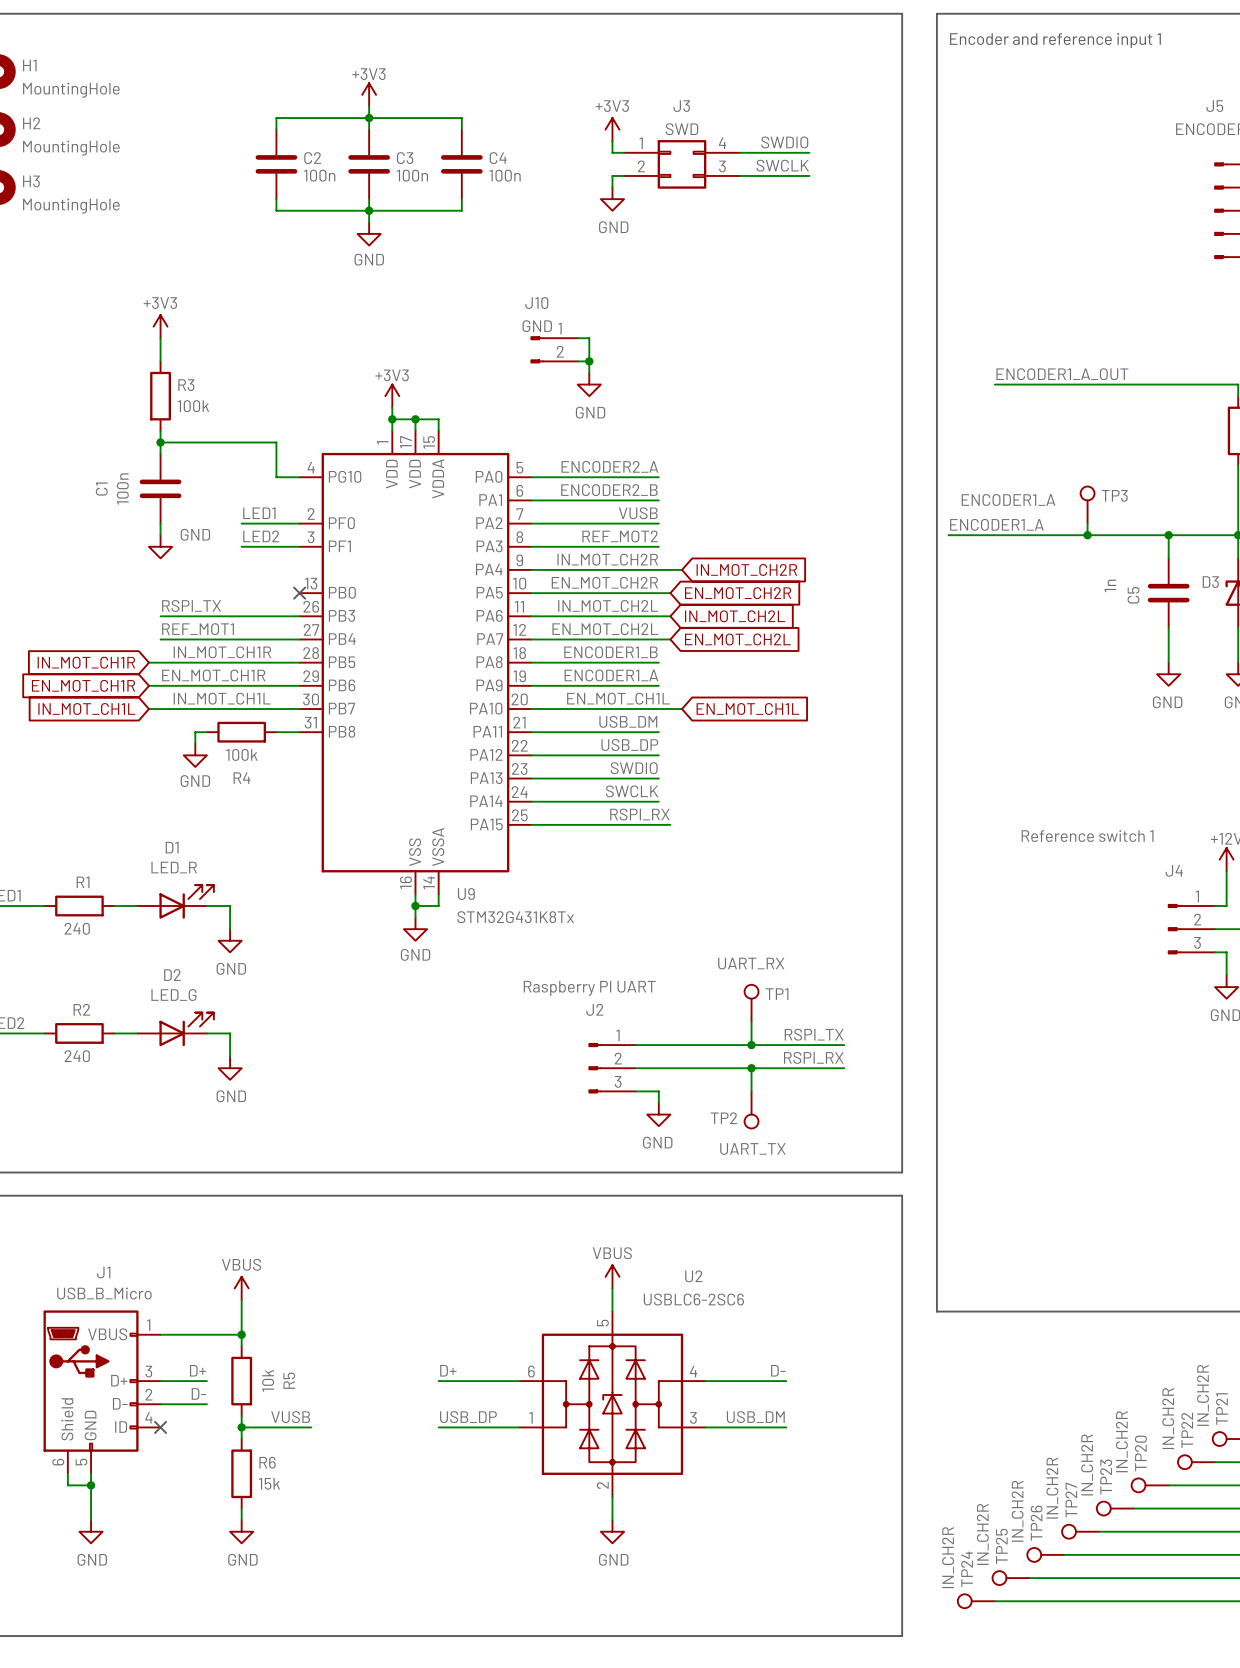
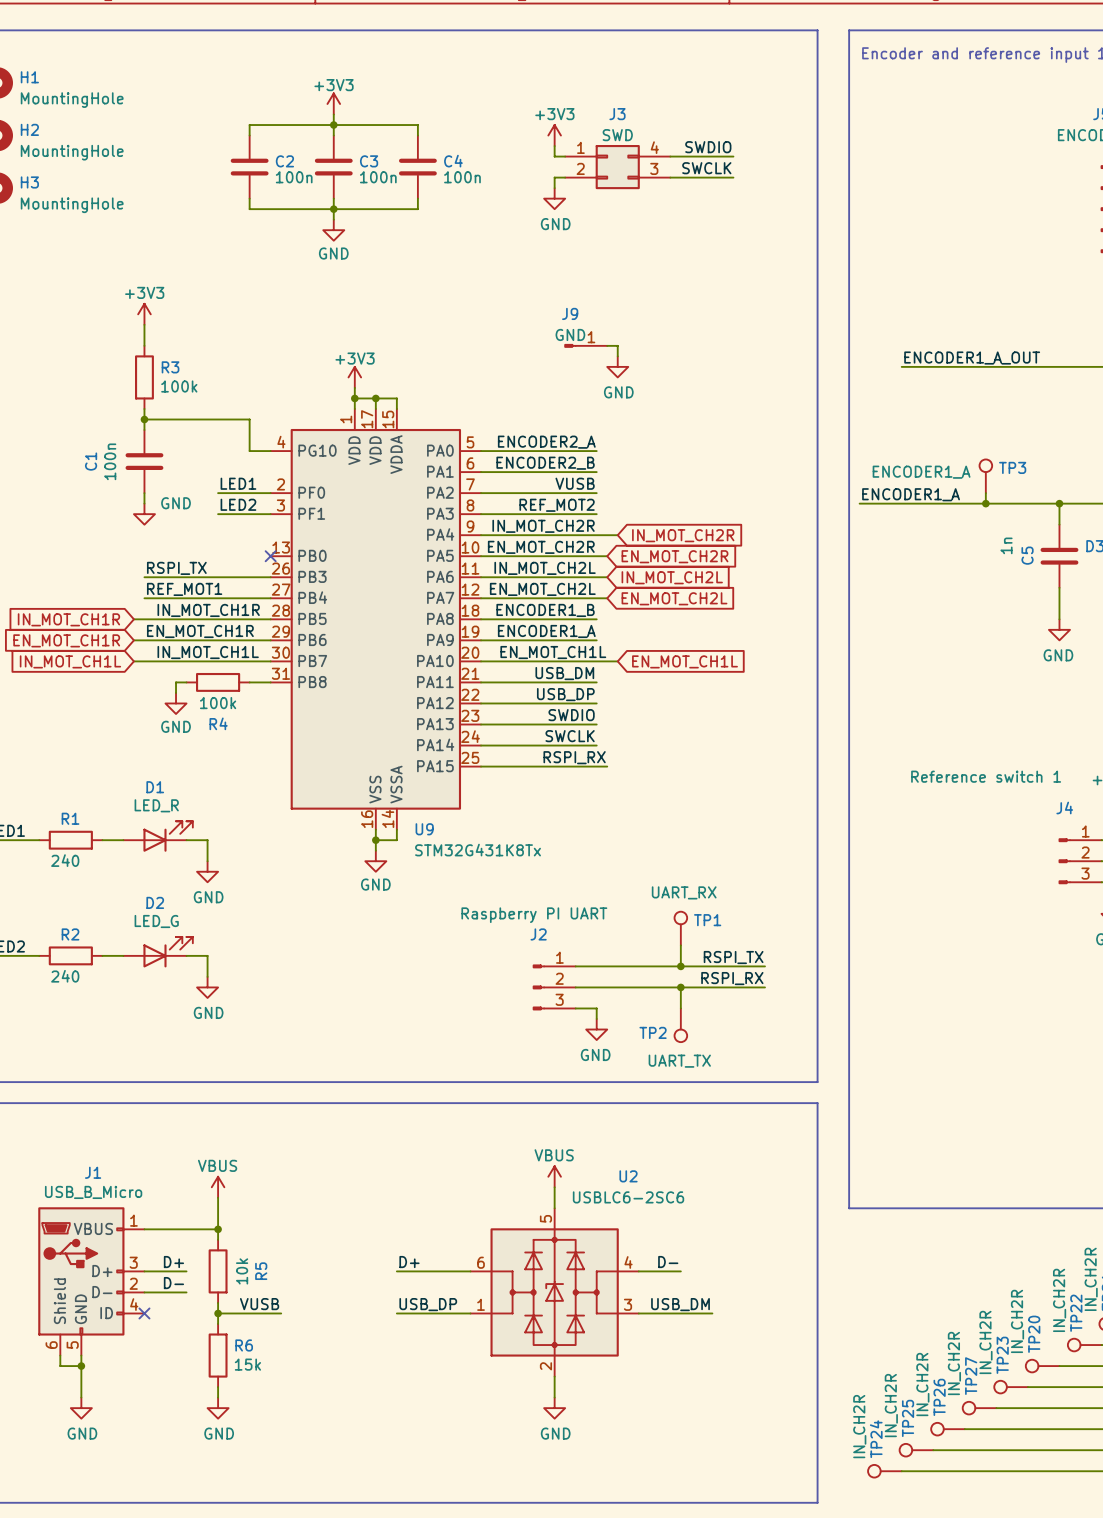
wire: (577, 338) (589, 338) (589, 372) -> none
J10: GND (554, 349) -> none
wire: (577, 361) (589, 361) -> none
junction: (589, 361) -> none
J9: none -> GND (585, 345)
wire: none -> (607, 345) (617, 345) (617, 356)
power symbol position: GND (589, 384) -> GND (617, 366)
label position: D- (778, 1370) -> D- (668, 1262)
wire: (751, 1381) (786, 1381) -> none

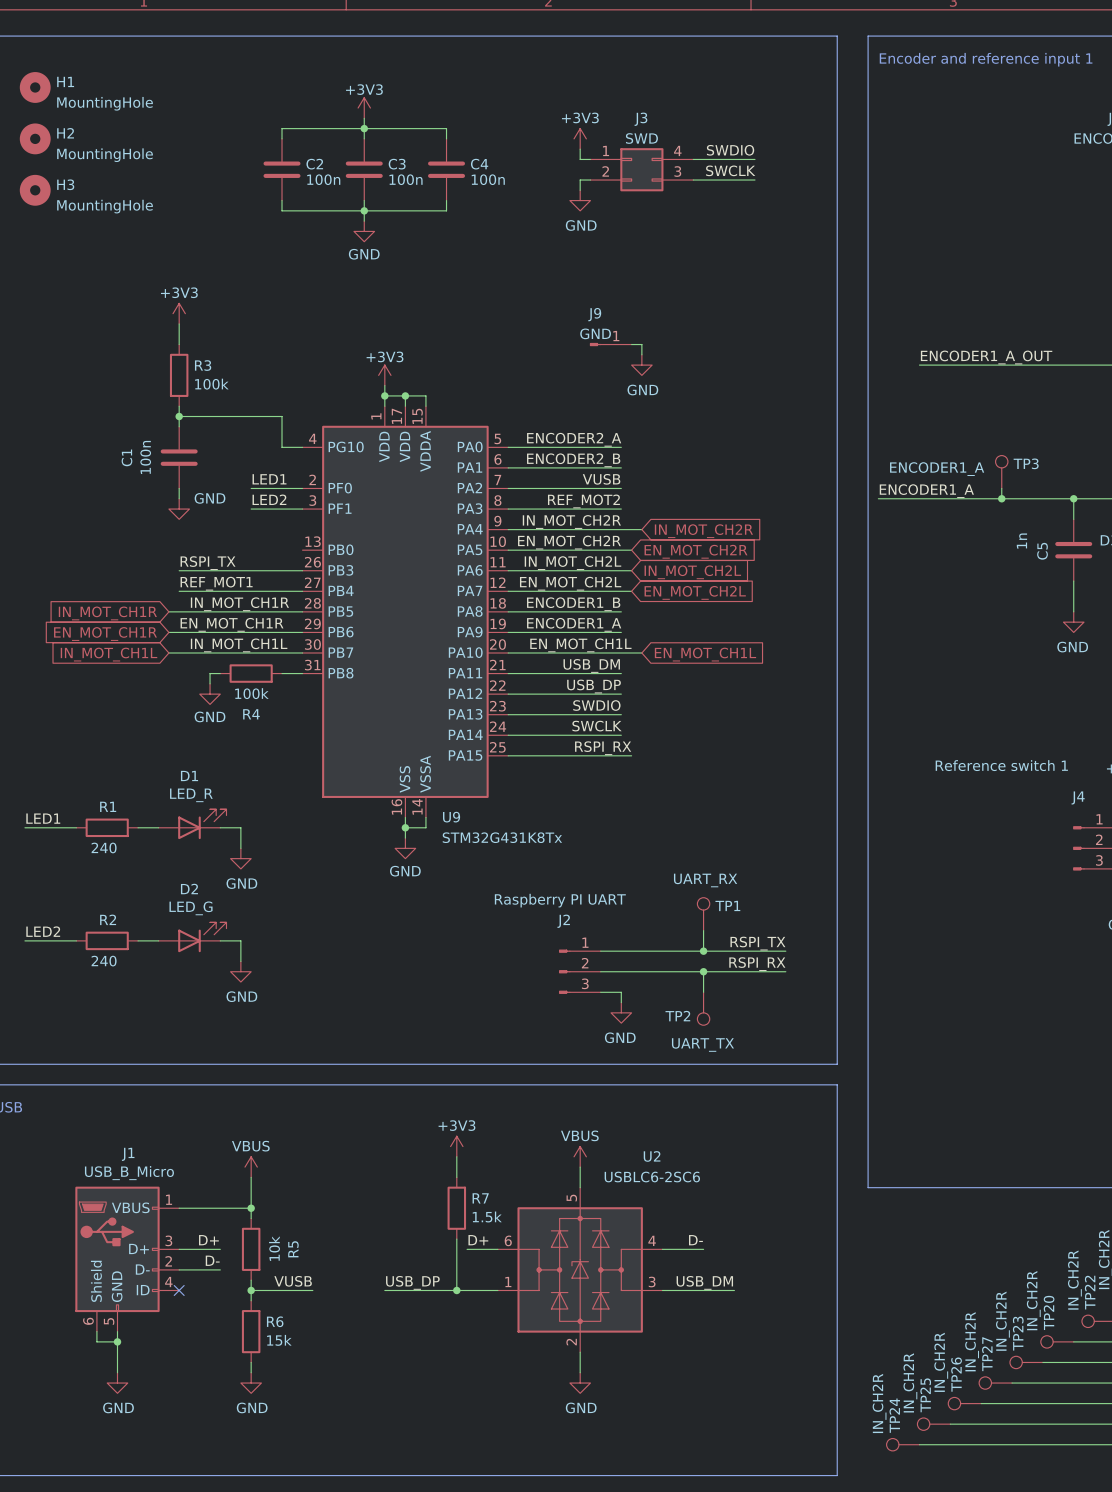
no-connect mark: (270, 556) -> none
power symbol: none -> +3V3 (456, 1146)
wire: none -> (456, 1156) (456, 1177)
R7: none -> 1.5k (456, 1208)
wire: none -> (456, 1239) (456, 1290)
label position: D+ (409, 1262) -> D+ (478, 1240)
wire: (396, 1271) (438, 1271) -> (384, 1290) (425, 1290)
label position: USB_DP (428, 1304) -> USB_DP (412, 1282)
junction: none -> (456, 1290)

